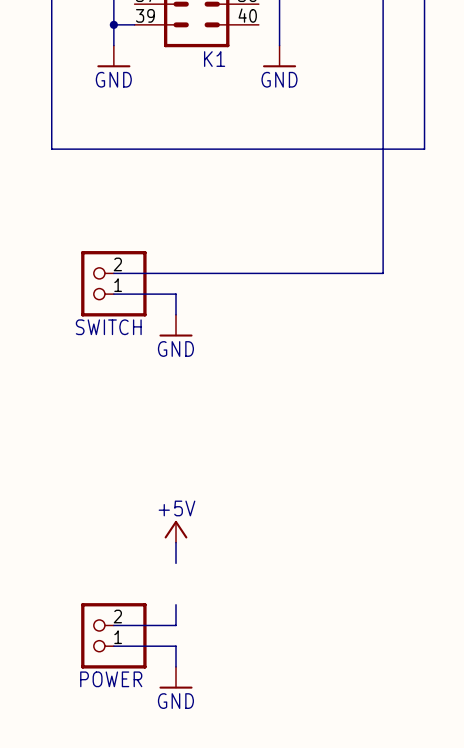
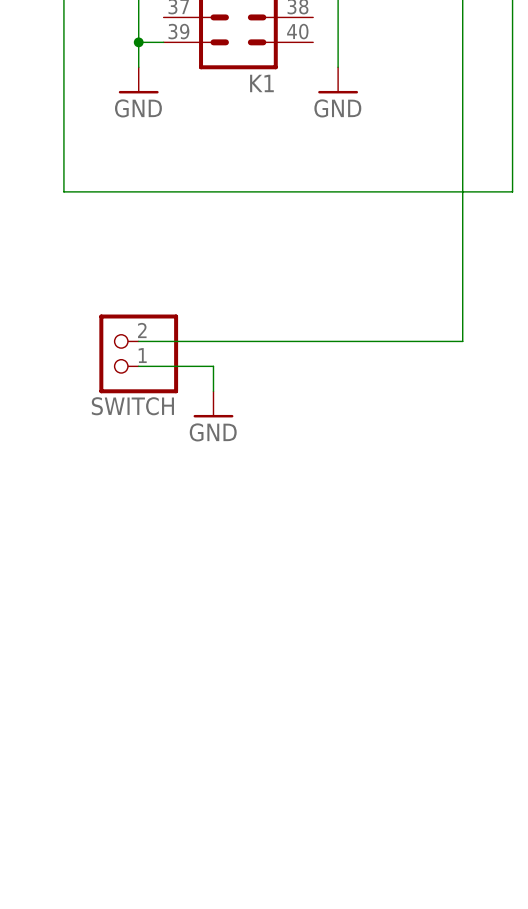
power symbol: +5V (176, 531) -> none
wire: (176, 542) (176, 563) -> none
wire: (176, 604) (176, 625) (113, 625) -> none
POWER: (113, 635) -> none
wire: (113, 646) (176, 646) (176, 666) -> none
power symbol: GND (176, 677) -> none

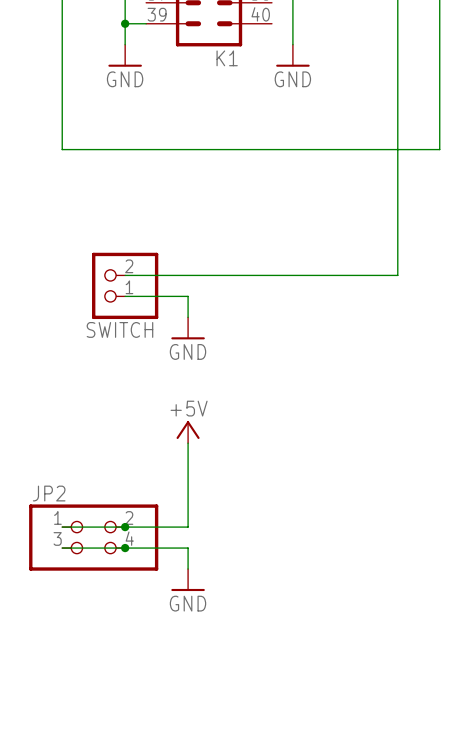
power symbol: none -> +5V (188, 432)
wire: none -> (188, 443) (188, 527) (62, 527)
junction: none -> (125, 527)
JP2: none -> (93, 537)
wire: none -> (62, 548) (188, 548) (188, 569)
junction: none -> (125, 548)
power symbol: none -> GND (188, 580)

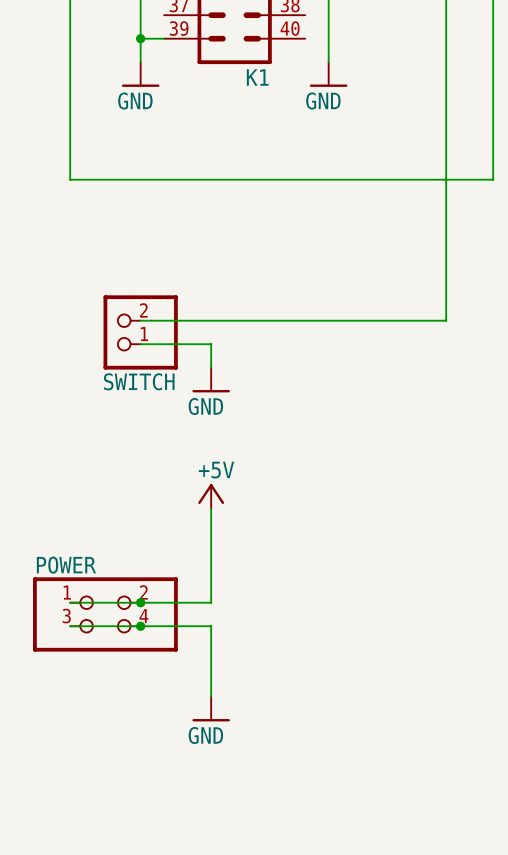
JP2 name: JP2 (49, 493) -> POWER (66, 565)
power symbol position: GND (188, 580) -> GND (211, 709)

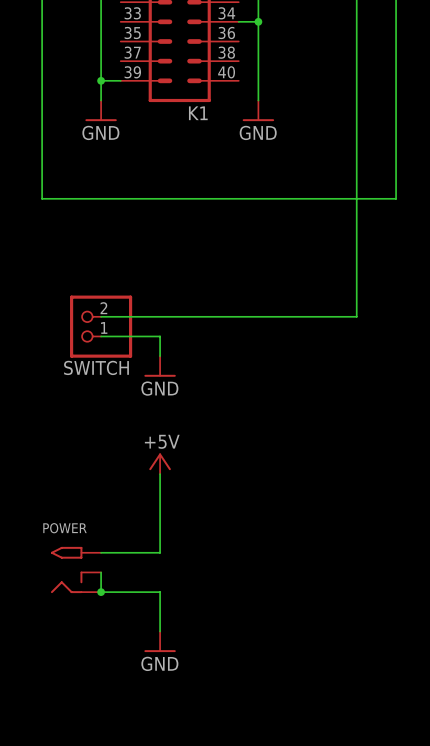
wire: (70, 602) (140, 602) -> none
junction: (140, 602) -> none
POWER: (105, 614) -> none
POWER: none -> (76, 569)
wire: (70, 626) (211, 626) (211, 649) -> (101, 572) (101, 592) (160, 592)
junction: (140, 626) -> none
junction: none -> (101, 592)

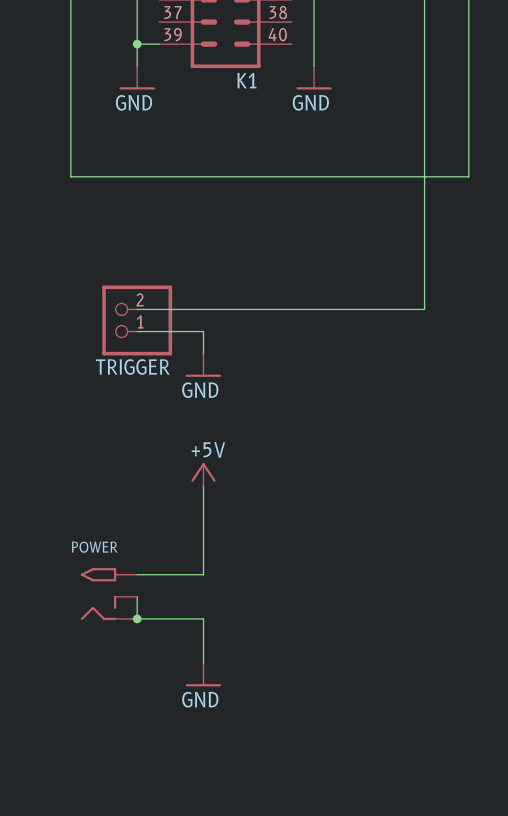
SWITCH name: SWITCH (96, 367) -> TRIGGER (132, 367)

